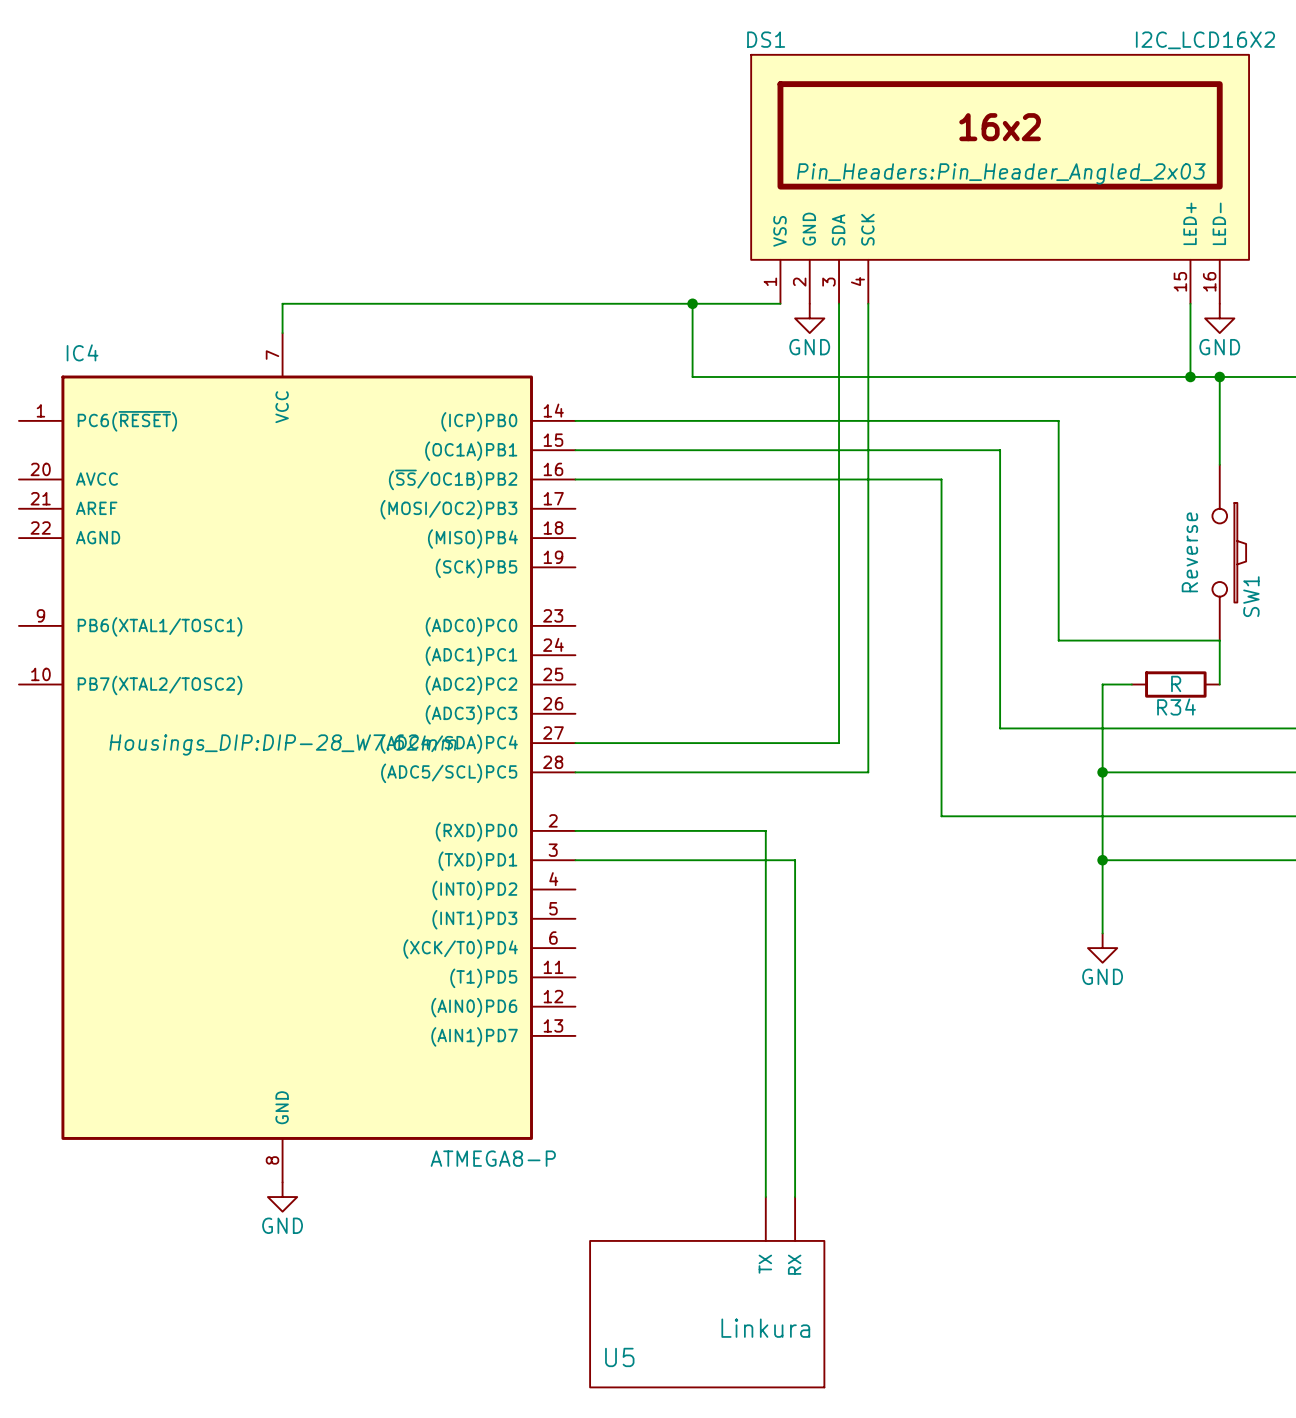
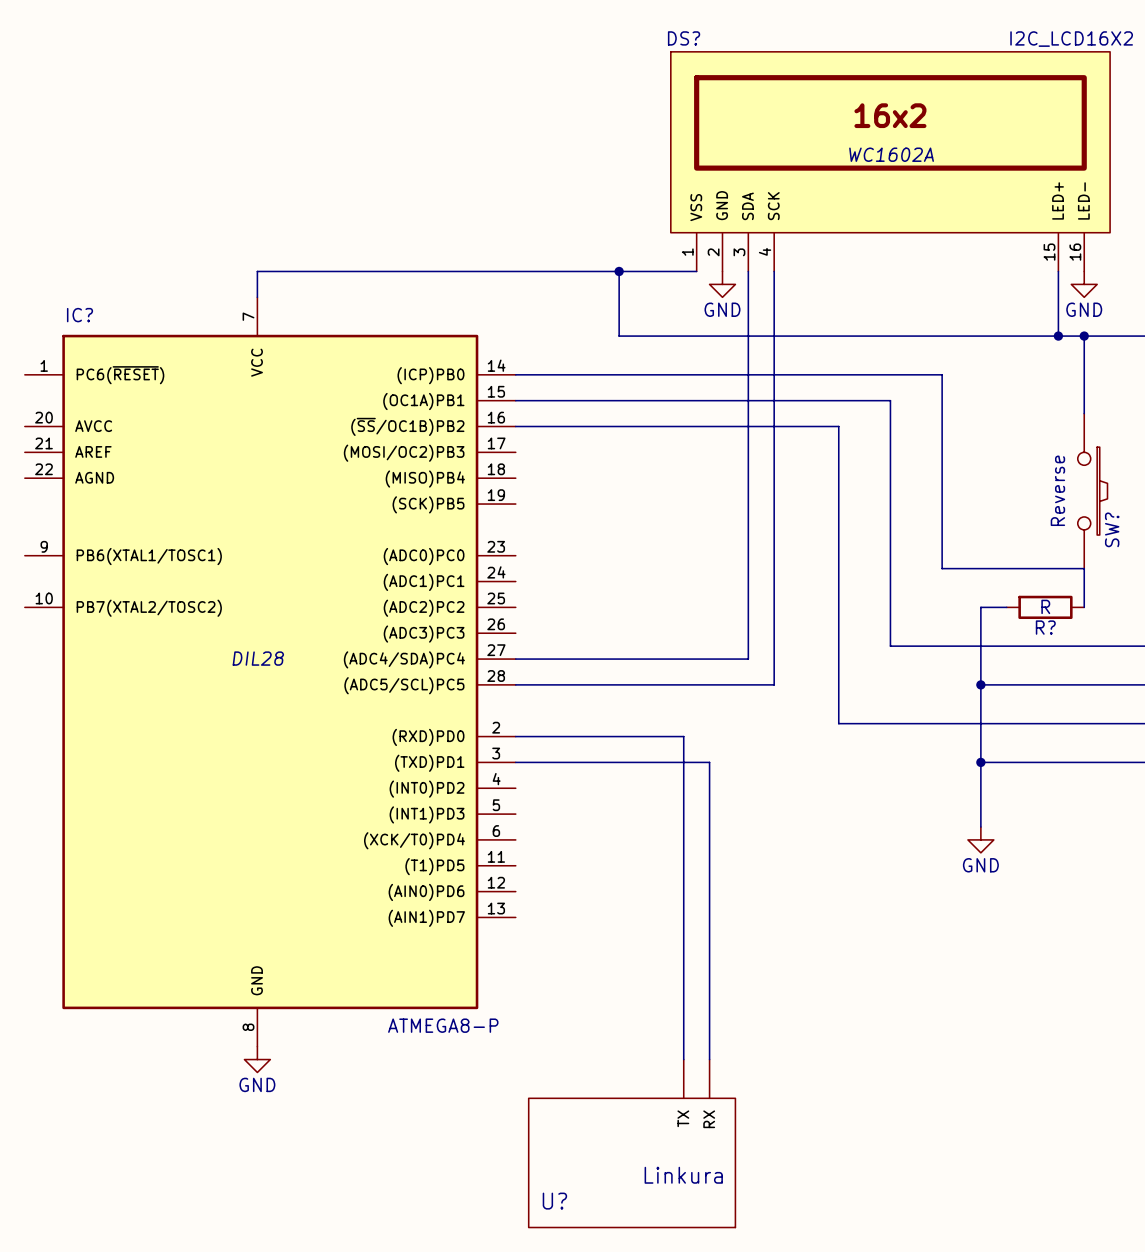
DS1 name: DS1 (766, 39) -> DS? (684, 38)
DS1 text: Pin_Headers:Pin_Header_Angled_2x03 (1001, 173) -> WC1602A (891, 154)
IC4 name: IC4 (82, 352) -> IC? (80, 315)
SW1 name: SW1 (1251, 596) -> SW? (1112, 529)
R34 name: R34 (1176, 707) -> R? (1045, 627)
IC4 text: Housings_DIP:DIP-28_W7.62mm (283, 744) -> DIL28 (258, 658)
U5 name: U5 (619, 1357) -> U? (554, 1201)

